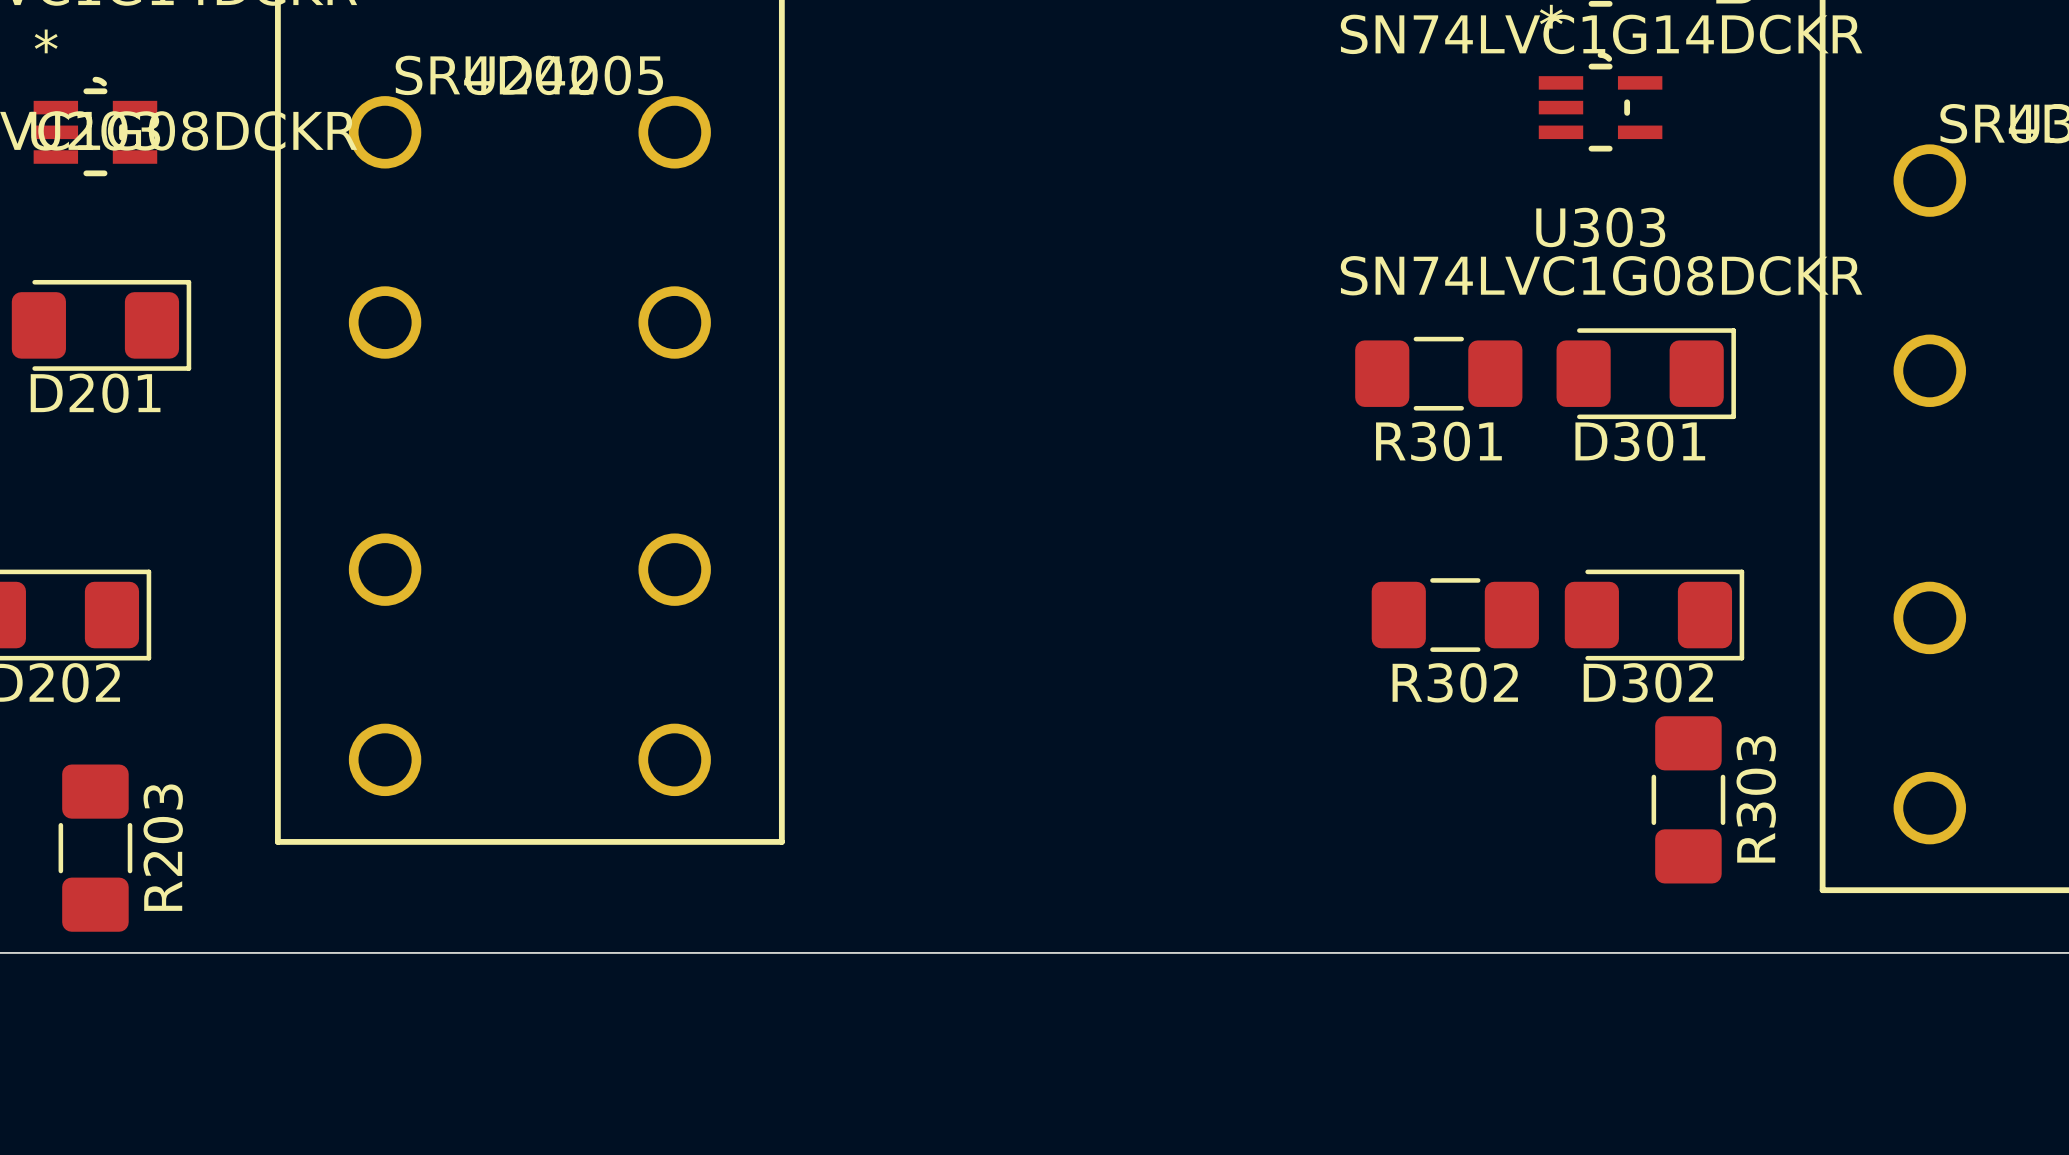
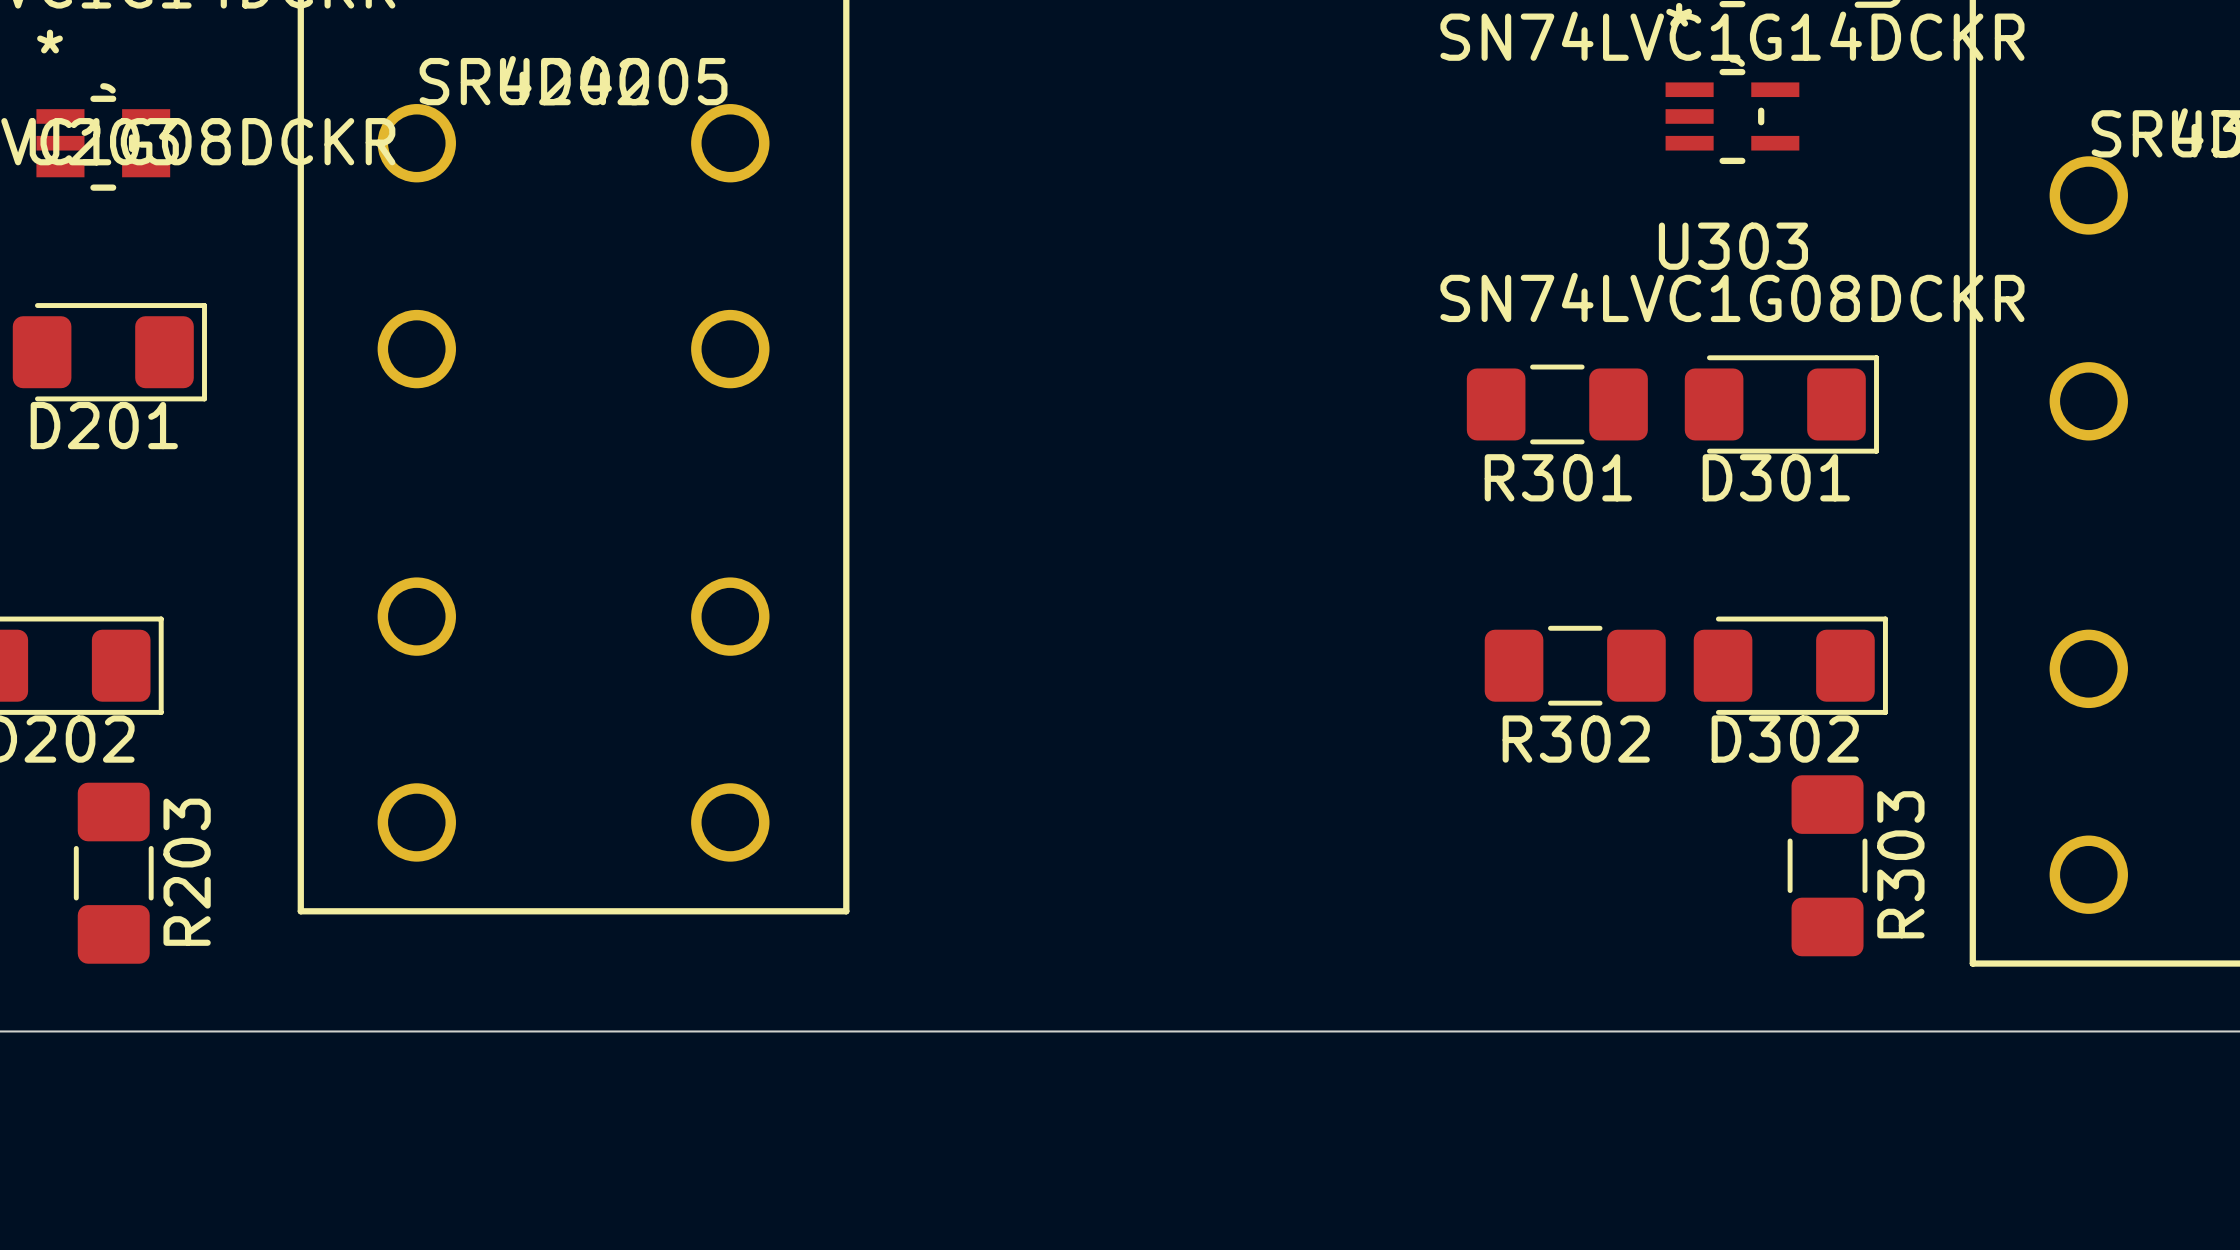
R203 position: (95, 848) -> (113, 873)

